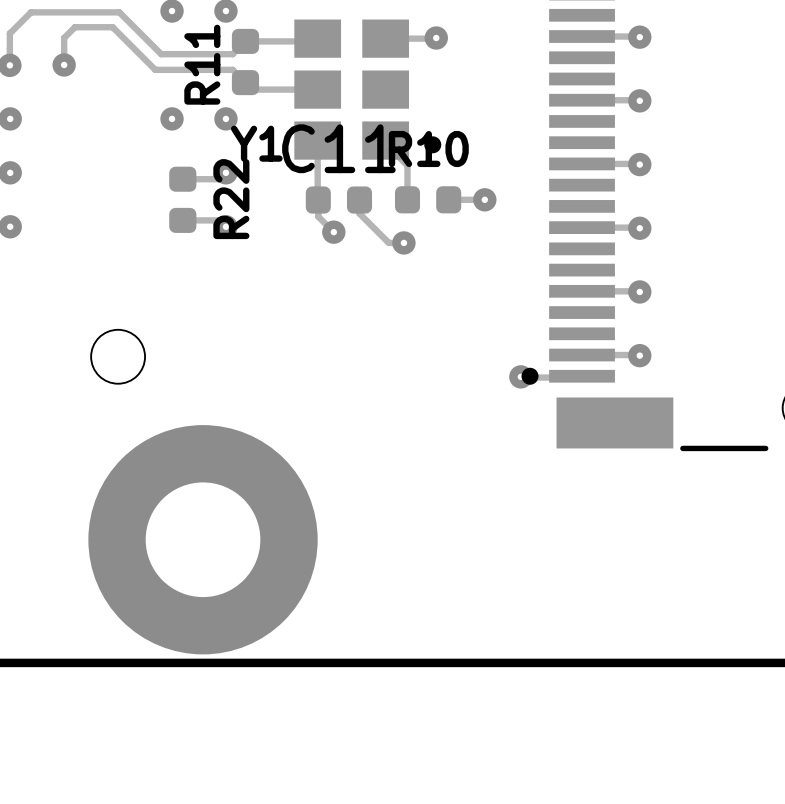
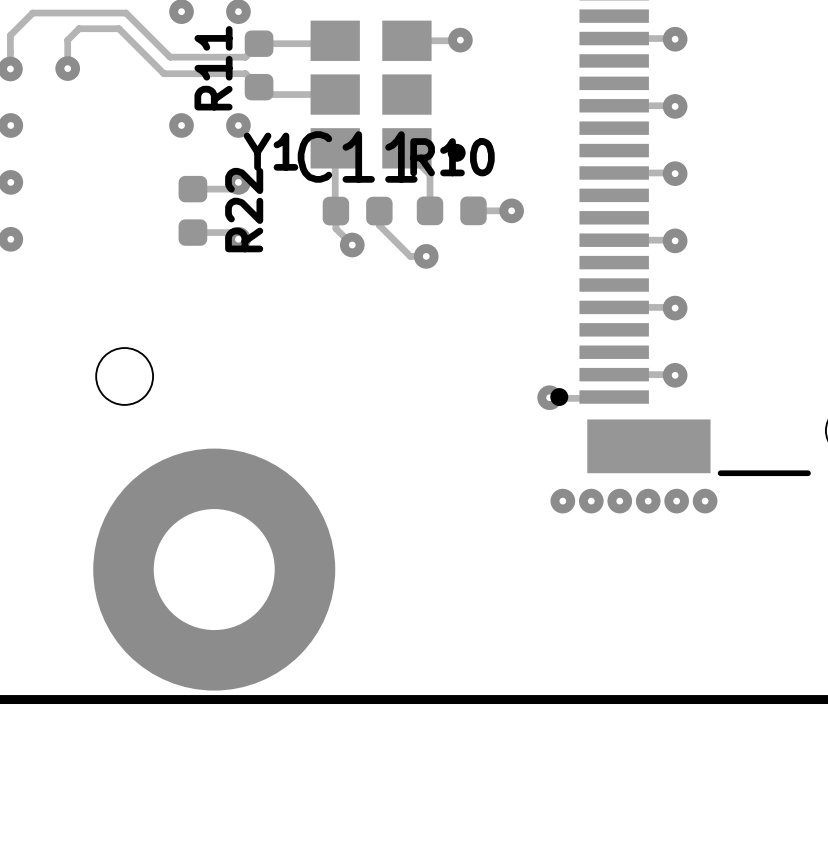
via: none -> (562, 501)
via: none -> (591, 501)
via: none -> (619, 501)
via: none -> (648, 501)
via: none -> (676, 501)
via: none -> (705, 501)

